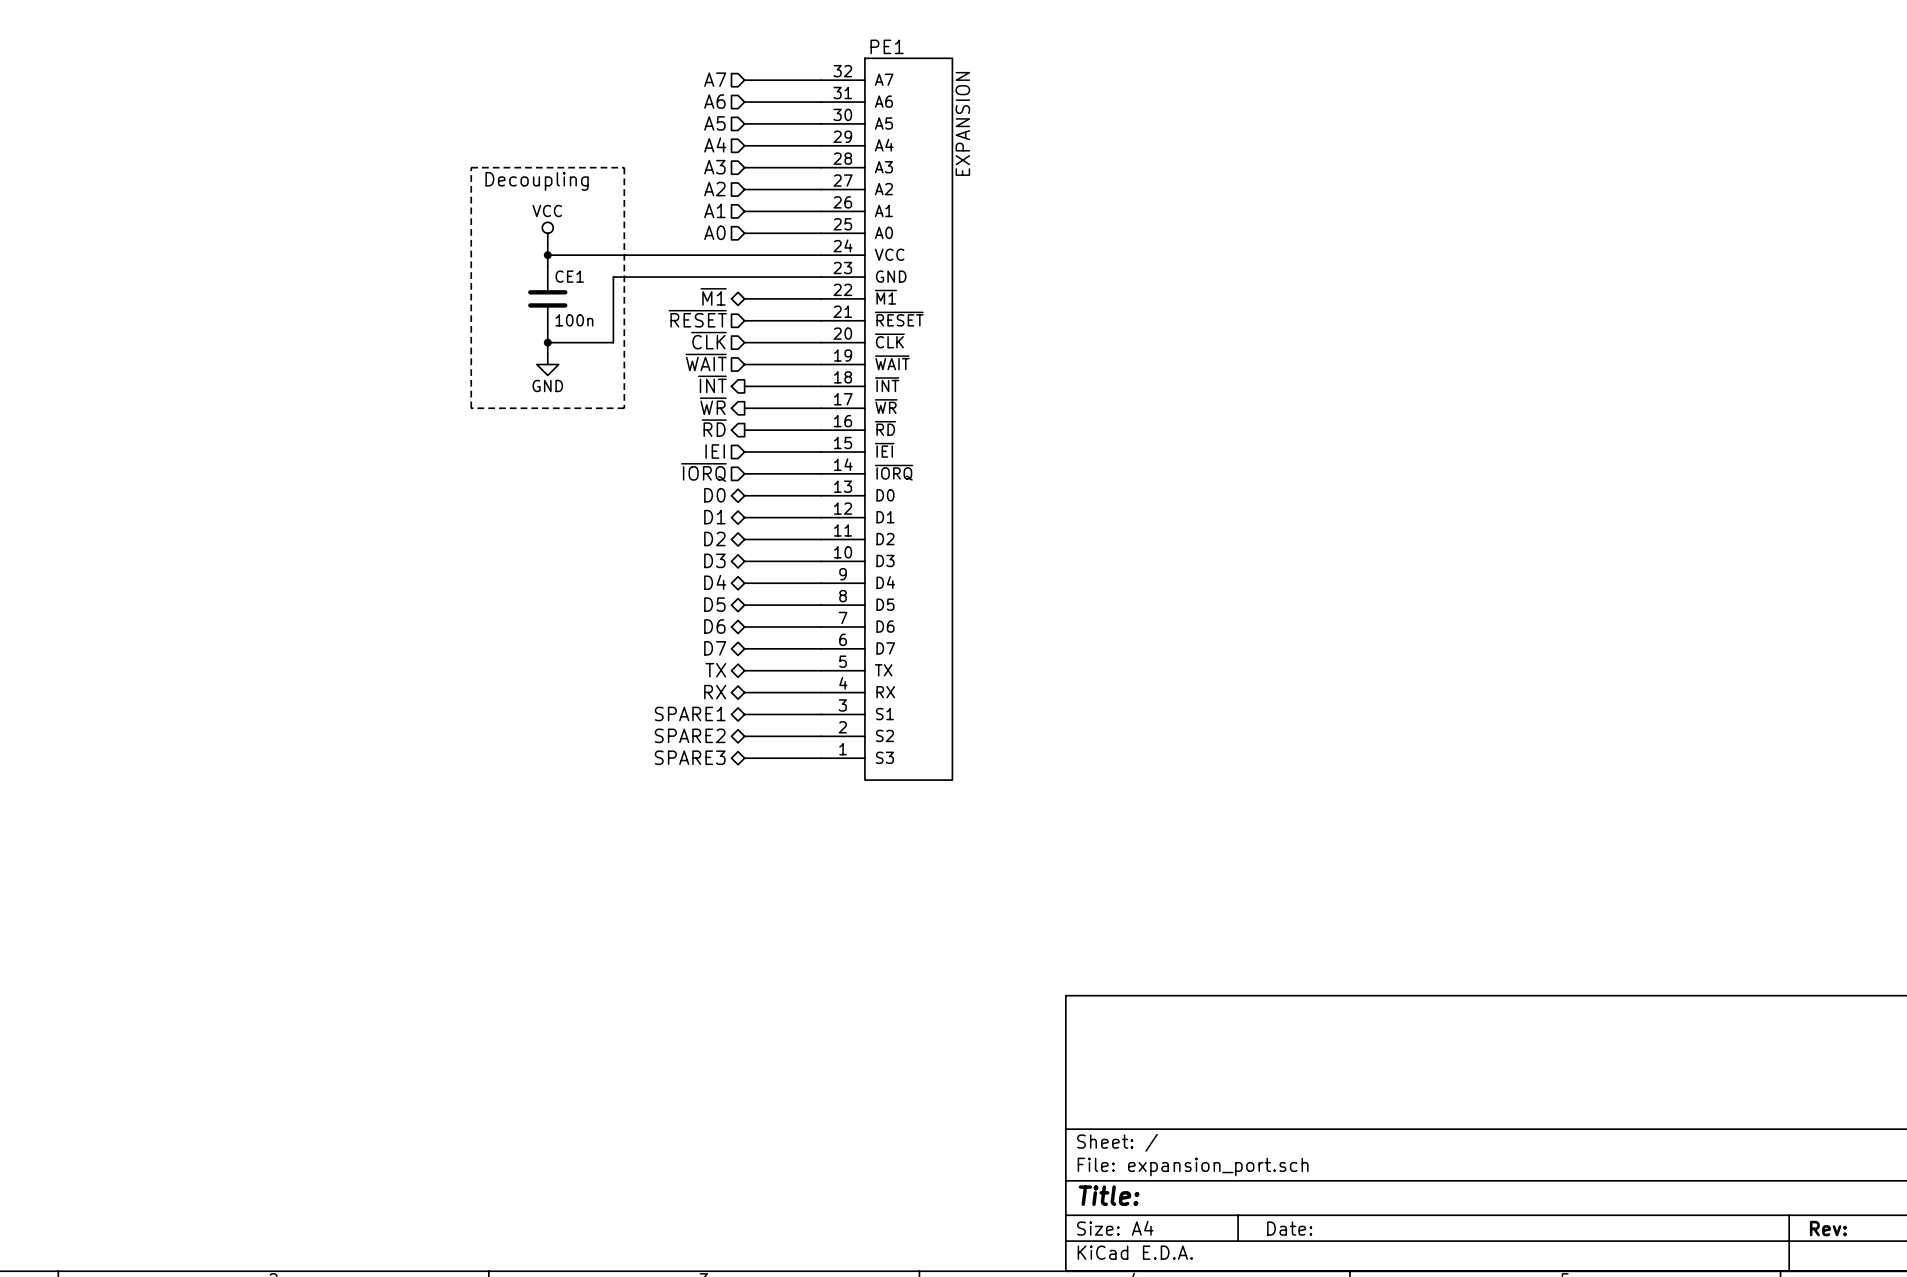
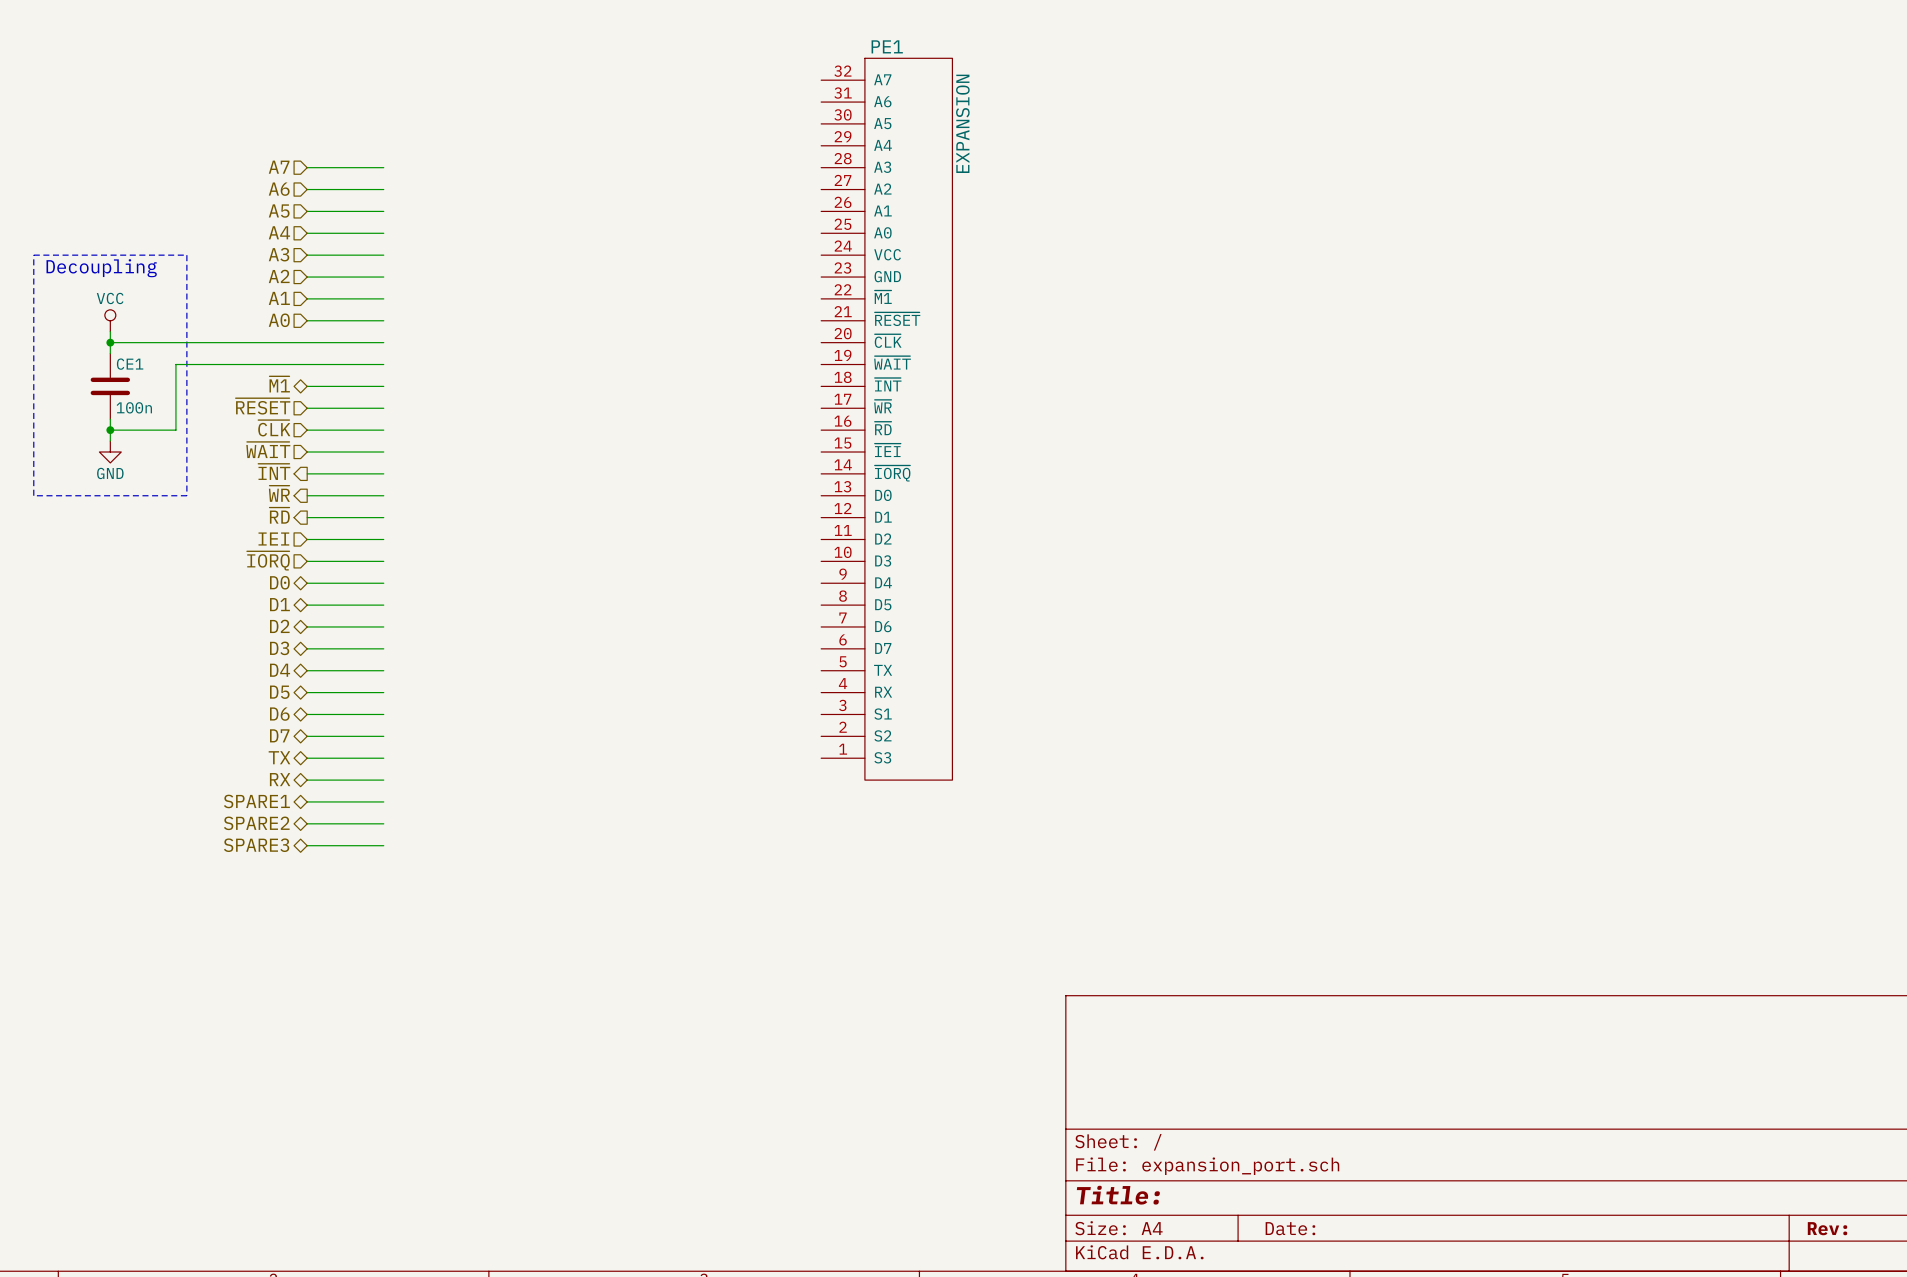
hierarchical label: A7 (715, 79) -> none
wire: (744, 80) (821, 80) -> none
hierarchical label: A6 (714, 101) -> none
wire: (744, 102) (821, 102) -> none
hierarchical label: A5 (714, 123) -> none
wire: (744, 123) (821, 123) -> none
hierarchical label: A4 (715, 144) -> none
wire: (744, 145) (821, 145) -> none
hierarchical label: none -> A7 (279, 167)
wire: none -> (307, 167) (383, 167)
line: (471, 167) (624, 167) (624, 408) (471, 408) (471, 167) -> none
hierarchical label: A3 (714, 167) -> none
wire: (744, 167) (821, 167) -> none
text: Decoupling (537, 181) -> none
hierarchical label: none -> A6 (279, 189)
wire: none -> (307, 189) (383, 189)
hierarchical label: A2 (714, 189) -> none
wire: (744, 189) (821, 189) -> none
hierarchical label: none -> A5 (279, 211)
hierarchical label: A1 (714, 210) -> none
wire: none -> (307, 211) (383, 211)
wire: (744, 211) (821, 211) -> none
hierarchical label: none -> A4 (279, 232)
hierarchical label: A0 (714, 232) -> none
wire: none -> (307, 233) (383, 233)
power symbol: VCC (547, 233) -> none
wire: (744, 233) (821, 233) -> none
wire: (547, 244) (547, 266) -> none
hierarchical label: none -> A3 (279, 254)
line: none -> (33, 255) (186, 255) (186, 495) (33, 495) (33, 255)
wire: none -> (307, 255) (383, 255)
wire: (547, 255) (821, 255) -> none
junction: (547, 255) -> none
text: none -> Decoupling (101, 268)
hierarchical label: none -> A2 (279, 276)
wire: none -> (307, 277) (383, 277)
wire: (821, 277) (613, 277) (613, 342) (547, 342) -> none
hierarchical label: ~{M1} (713, 296) -> none
hierarchical label: none -> A1 (279, 298)
wire: none -> (307, 298) (383, 298)
CE1 position: (547, 298) -> (110, 386)
wire: (744, 298) (821, 298) -> none
hierarchical label: ~{RESET} (697, 318) -> none
power symbol: none -> VCC (110, 320)
hierarchical label: none -> A0 (279, 320)
wire: none -> (307, 320) (383, 320)
wire: (744, 320) (821, 320) -> none
wire: none -> (110, 331) (110, 353)
wire: (547, 331) (547, 353) -> none
hierarchical label: ~{CLK} (708, 340) -> none
wire: none -> (110, 342) (383, 342)
junction: none -> (110, 342)
junction: (547, 342) -> none
wire: (744, 342) (821, 342) -> none
hierarchical label: ~{WAIT} (706, 362) -> none
wire: none -> (383, 364) (175, 364) (175, 430) (110, 430)
power symbol: GND (547, 364) -> none
wire: (744, 364) (821, 364) -> none
hierarchical label: none -> ~{M1} (279, 384)
hierarchical label: ~{INT} (712, 384) -> none
wire: none -> (307, 386) (383, 386)
wire: (744, 386) (821, 386) -> none
hierarchical label: none -> ~{RESET} (263, 406)
hierarchical label: ~{WR} (713, 406) -> none
wire: none -> (307, 408) (383, 408)
wire: (744, 408) (821, 408) -> none
wire: none -> (110, 419) (110, 441)
hierarchical label: none -> ~{CLK} (274, 428)
hierarchical label: ~{RD} (714, 428) -> none
junction: none -> (110, 430)
wire: none -> (307, 430) (383, 430)
wire: (744, 430) (821, 430) -> none
hierarchical label: none -> ~{WAIT} (268, 450)
hierarchical label: IEI (715, 451) -> none
power symbol: none -> GND (110, 452)
wire: none -> (307, 452) (383, 452)
wire: (744, 452) (821, 452) -> none
hierarchical label: none -> ~{INT} (274, 471)
hierarchical label: ~{IORQ} (703, 472) -> none
wire: none -> (307, 473) (383, 473)
wire: (744, 473) (821, 473) -> none
hierarchical label: none -> ~{WR} (279, 493)
wire: none -> (307, 495) (383, 495)
hierarchical label: D0 (714, 495) -> none
wire: (744, 495) (821, 495) -> none
hierarchical label: none -> ~{RD} (279, 515)
wire: none -> (307, 517) (383, 517)
hierarchical label: D1 (714, 517) -> none
wire: (744, 517) (821, 517) -> none
hierarchical label: none -> IEI (273, 539)
wire: none -> (307, 539) (383, 539)
hierarchical label: D2 (714, 539) -> none
wire: (744, 539) (821, 539) -> none
hierarchical label: none -> ~{IORQ} (268, 560)
hierarchical label: D3 (714, 560) -> none
wire: none -> (307, 561) (383, 561)
wire: (744, 561) (821, 561) -> none
hierarchical label: none -> D0 (279, 582)
hierarchical label: D4 (715, 582) -> none
wire: none -> (307, 583) (383, 583)
wire: (744, 583) (821, 583) -> none
hierarchical label: none -> D1 (279, 604)
hierarchical label: D5 (714, 604) -> none
wire: none -> (307, 605) (383, 605)
wire: (744, 605) (821, 605) -> none
hierarchical label: none -> D2 (279, 626)
wire: none -> (307, 626) (383, 626)
hierarchical label: D6 (714, 626) -> none
wire: (744, 626) (821, 626) -> none
hierarchical label: none -> D3 (279, 648)
wire: none -> (307, 648) (383, 648)
hierarchical label: D7 (715, 648) -> none
wire: (744, 648) (821, 648) -> none
hierarchical label: none -> D4 (280, 670)
wire: none -> (307, 670) (383, 670)
hierarchical label: TX (715, 670) -> none
wire: (744, 670) (821, 670) -> none
hierarchical label: none -> D5 (279, 692)
wire: none -> (307, 692) (383, 692)
hierarchical label: RX (715, 692) -> none
wire: (744, 692) (821, 692) -> none
hierarchical label: none -> D6 (279, 714)
hierarchical label: SPARE1 (690, 713) -> none
wire: none -> (307, 714) (383, 714)
wire: (744, 714) (821, 714) -> none
hierarchical label: none -> D7 (279, 735)
hierarchical label: SPARE2 (690, 735) -> none
wire: none -> (307, 736) (383, 736)
wire: (744, 736) (821, 736) -> none
hierarchical label: none -> TX (279, 757)
hierarchical label: SPARE3 (690, 757) -> none
wire: none -> (307, 758) (383, 758)
wire: (744, 758) (821, 758) -> none
hierarchical label: none -> RX (280, 779)
wire: none -> (307, 780) (383, 780)
hierarchical label: none -> SPARE1 (256, 801)
wire: none -> (307, 801) (383, 801)
hierarchical label: none -> SPARE2 (256, 823)
wire: none -> (307, 823) (383, 823)
hierarchical label: none -> SPARE3 (256, 845)
wire: none -> (307, 845) (383, 845)

